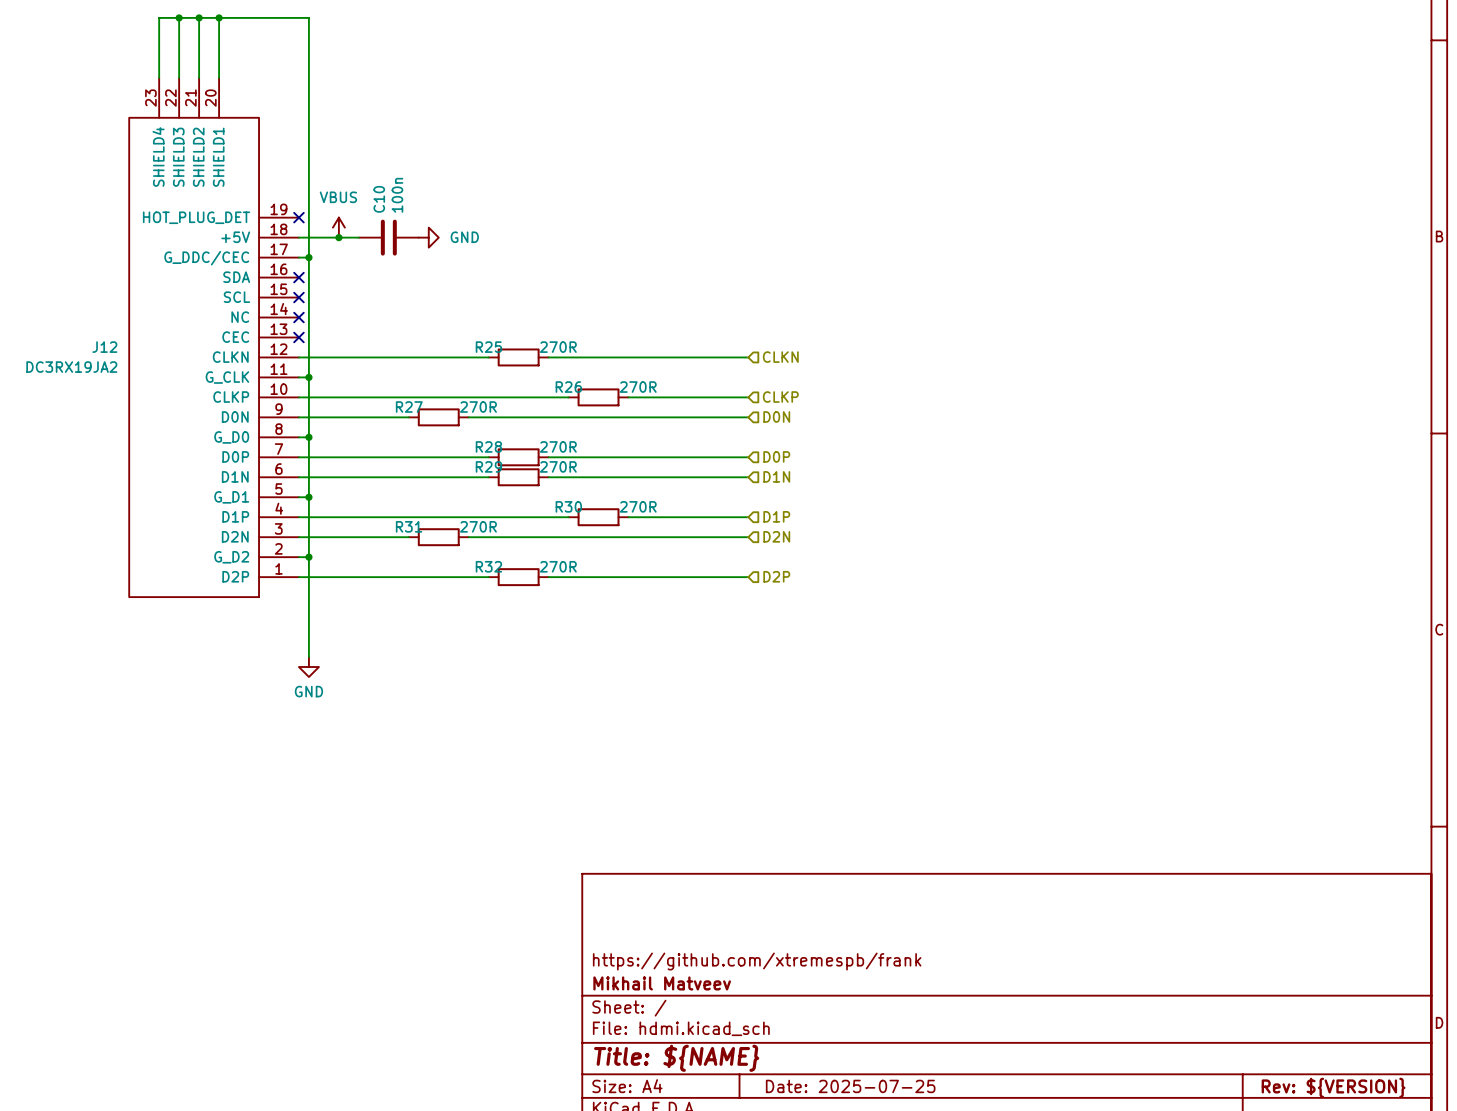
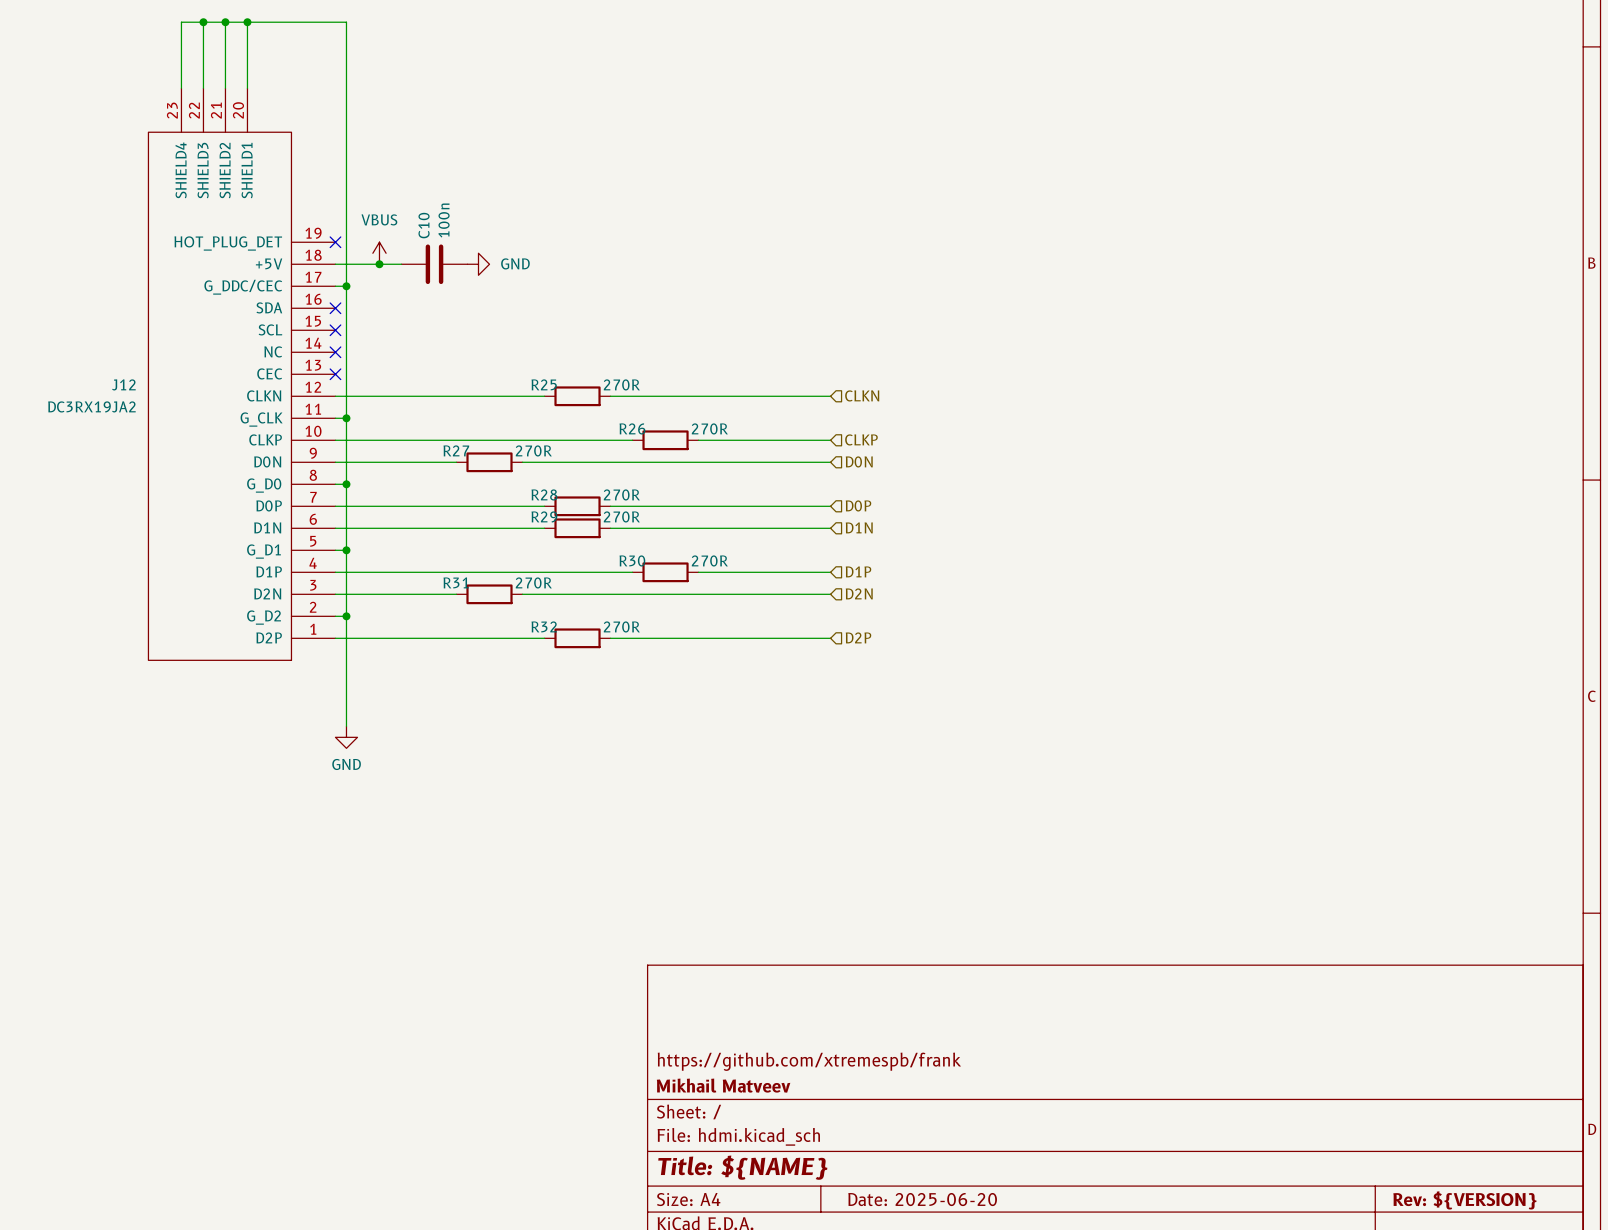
title block: Date: 2025-07-25 (850, 1086) -> Date: 2025-06-20 (922, 1199)

